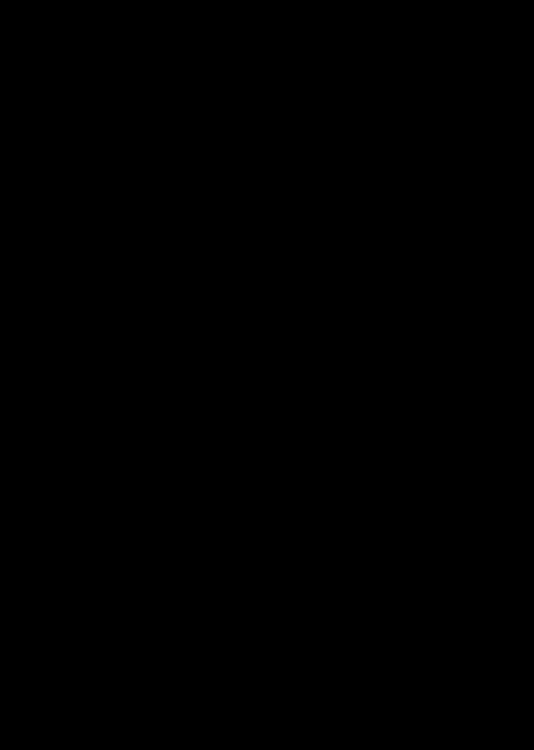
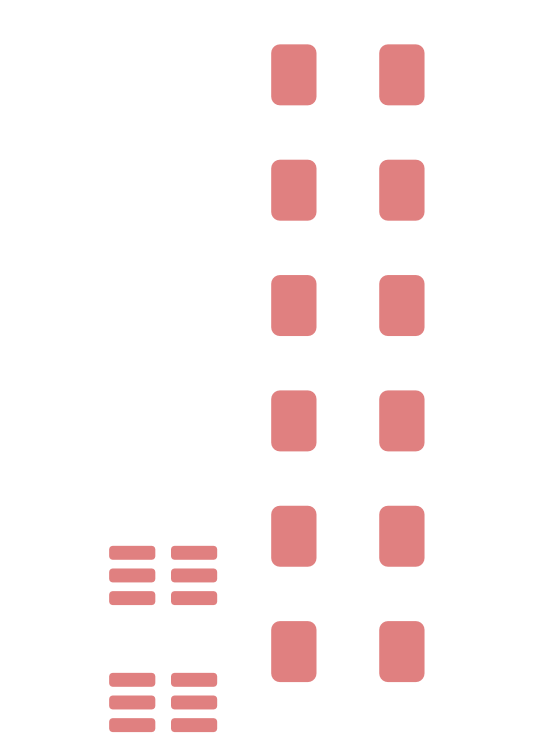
part: none -> (347, 74)
part: none -> (347, 190)
part: none -> (347, 305)
part: none -> (347, 420)
part: none -> (347, 536)
part: none -> (163, 575)
part: none -> (347, 651)
part: none -> (163, 702)

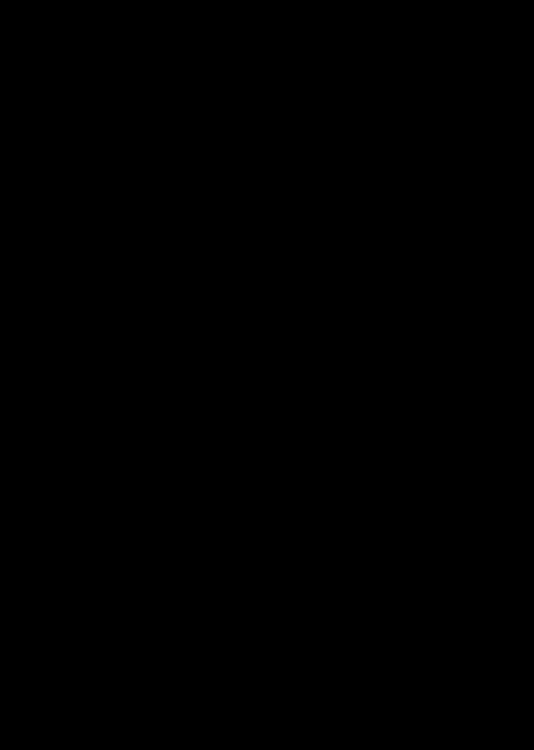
part: (347, 74) -> none
part: (347, 190) -> none
part: (347, 305) -> none
part: (347, 420) -> none
part: (347, 536) -> none
part: (163, 575) -> none
part: (347, 651) -> none
part: (163, 702) -> none

